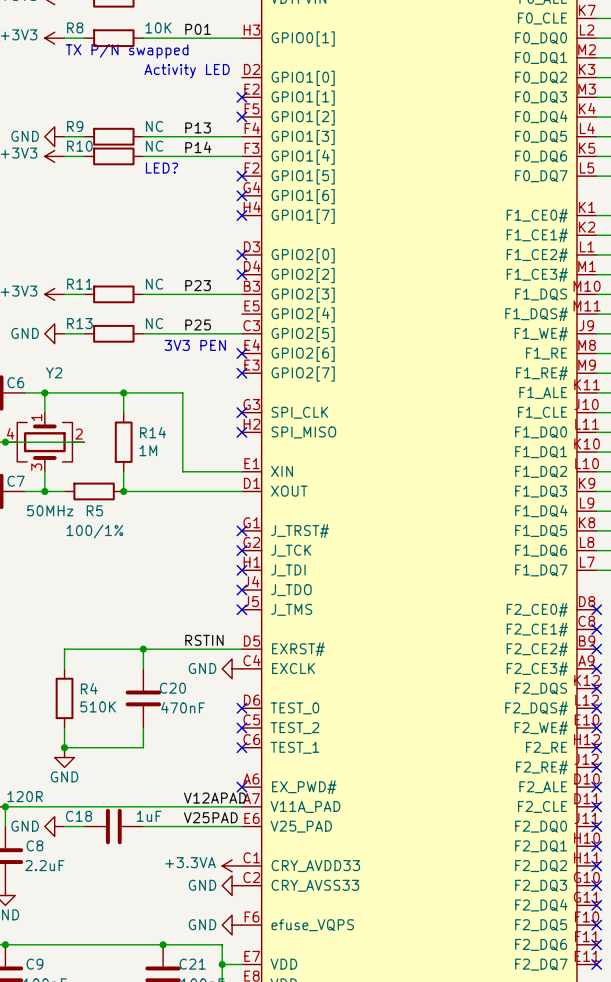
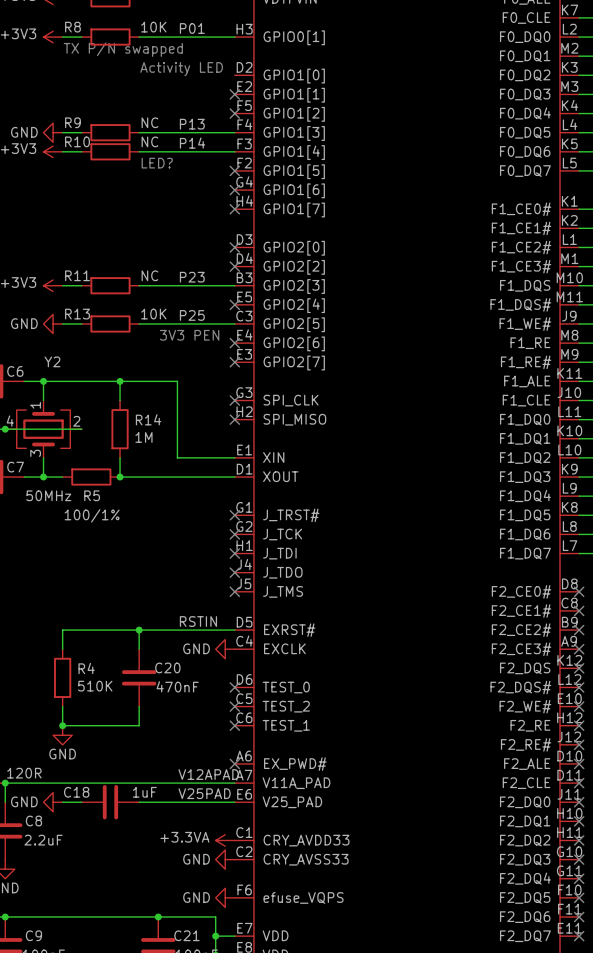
no-connect mark: none -> (234, 304)
R13 value: NC (154, 323) -> 10K (153, 314)

